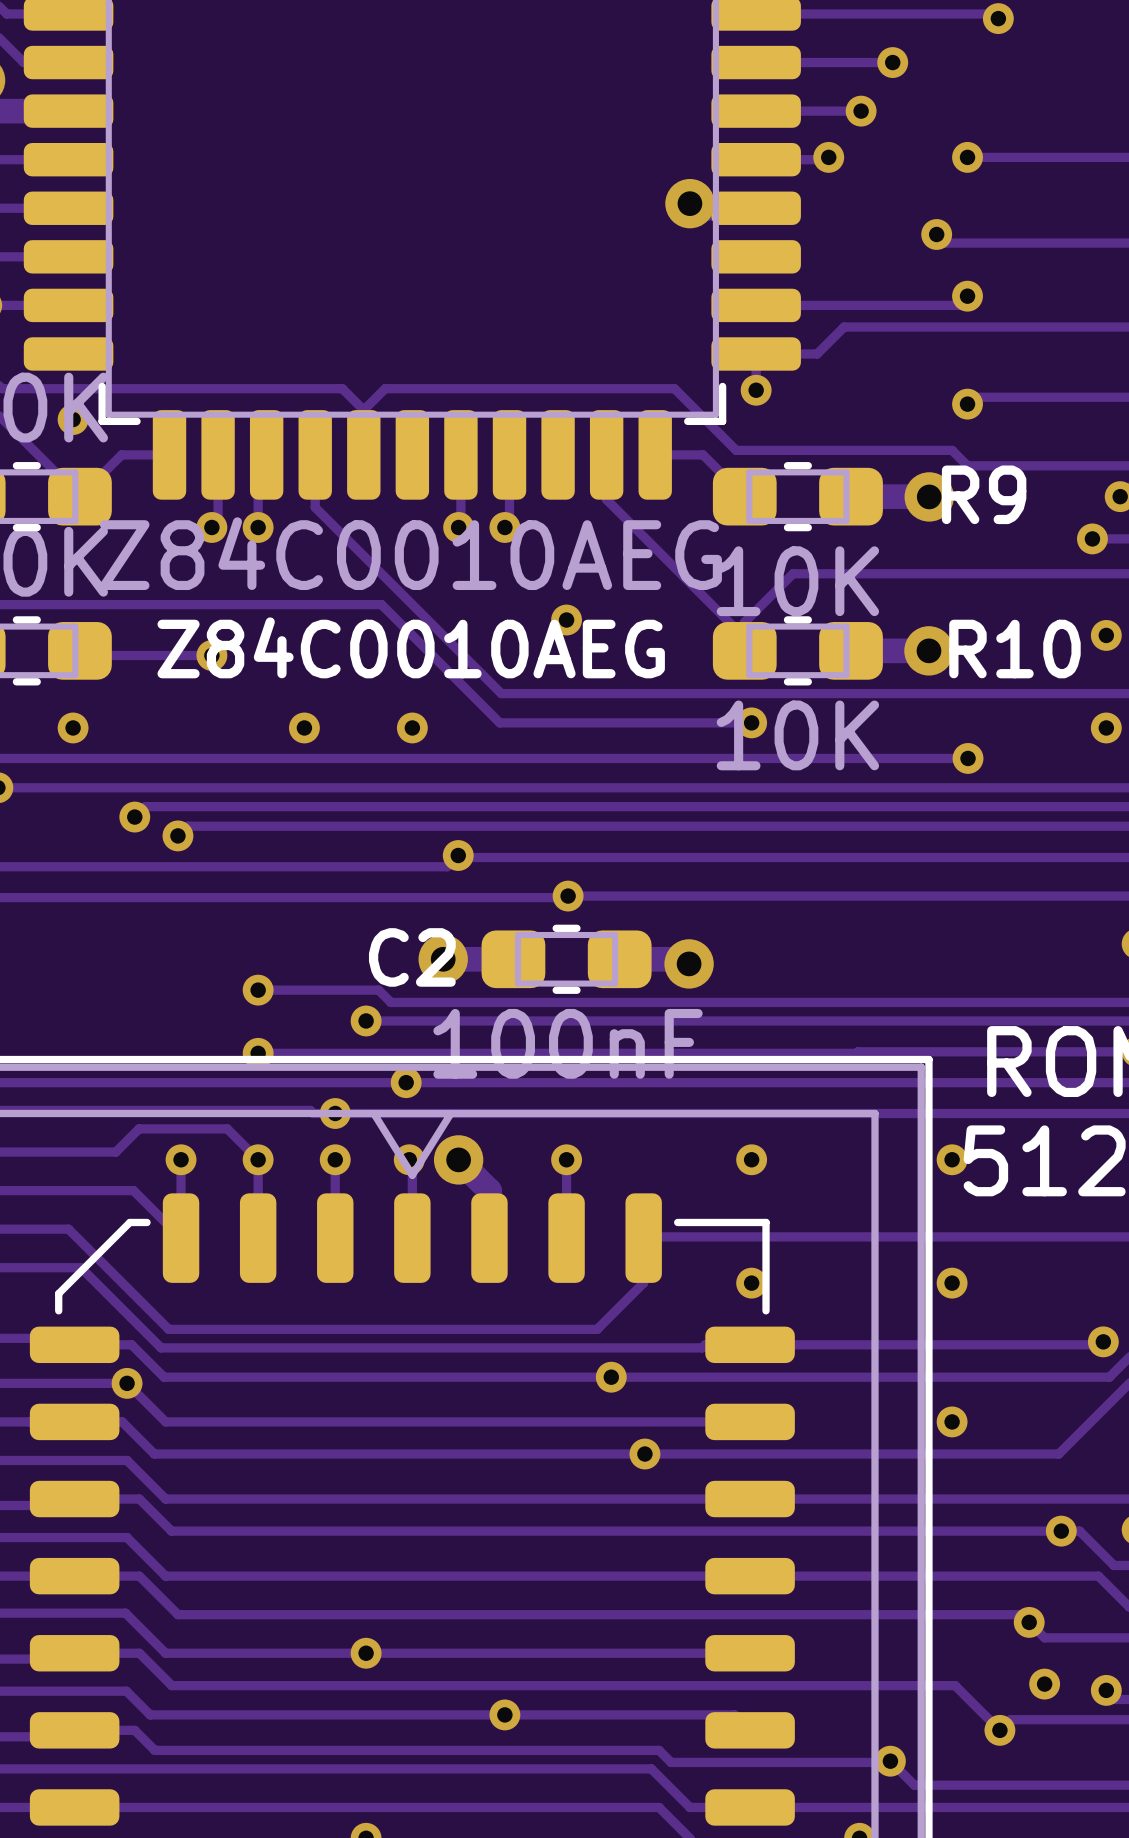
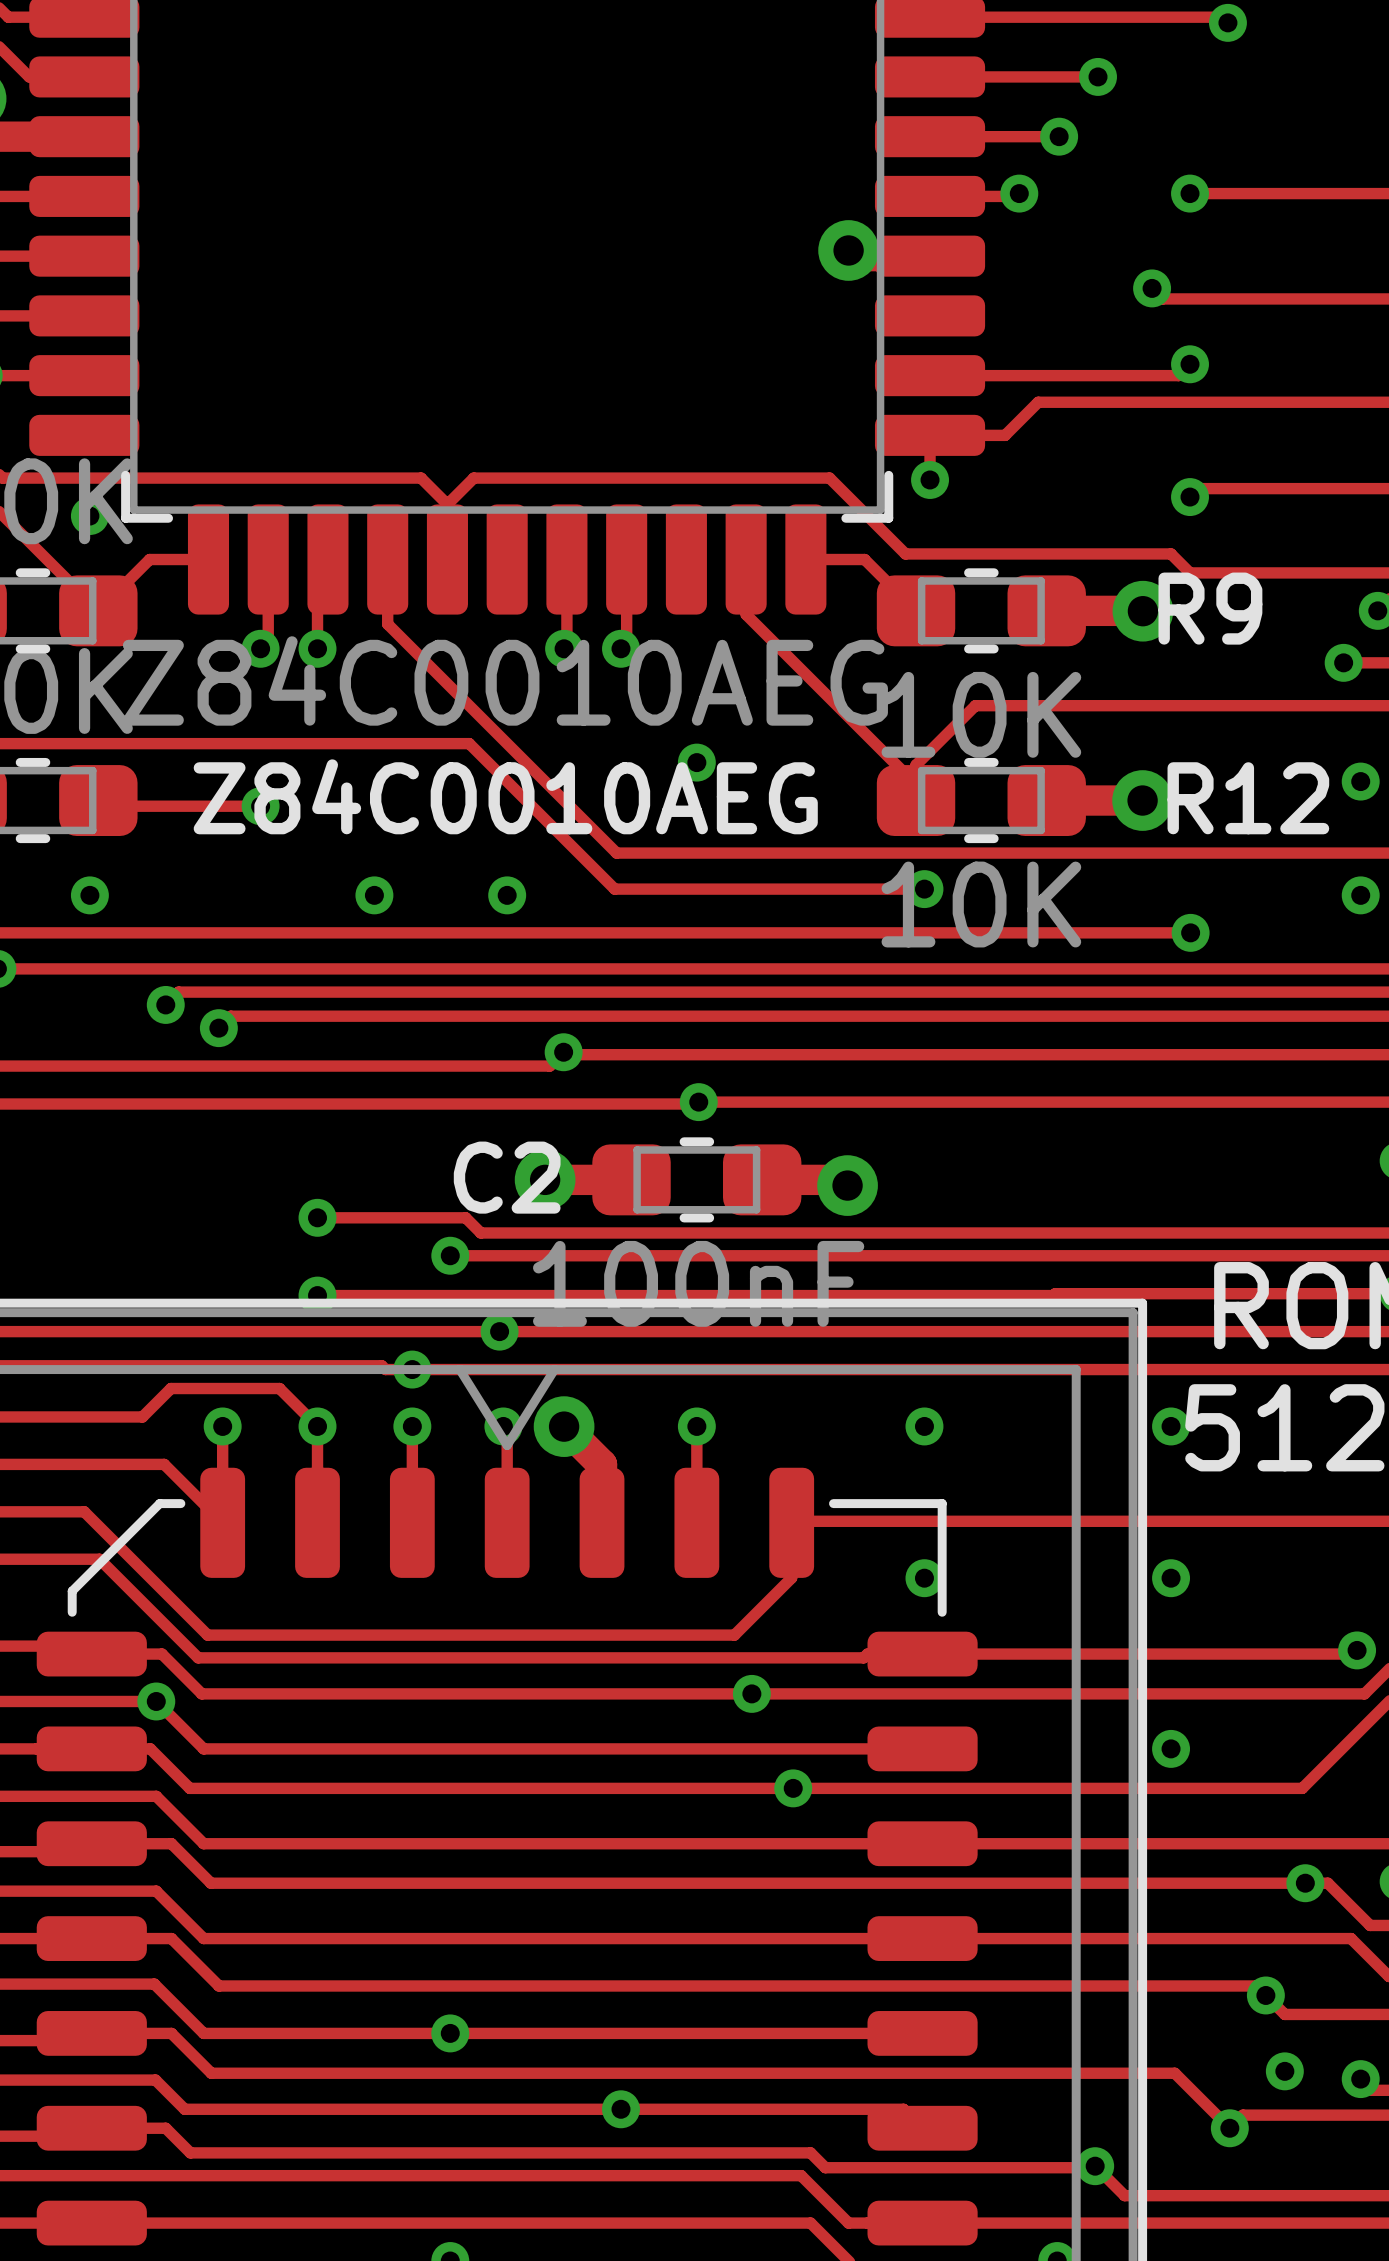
R10 name: R10 (1014, 649) -> R12 (1248, 798)

